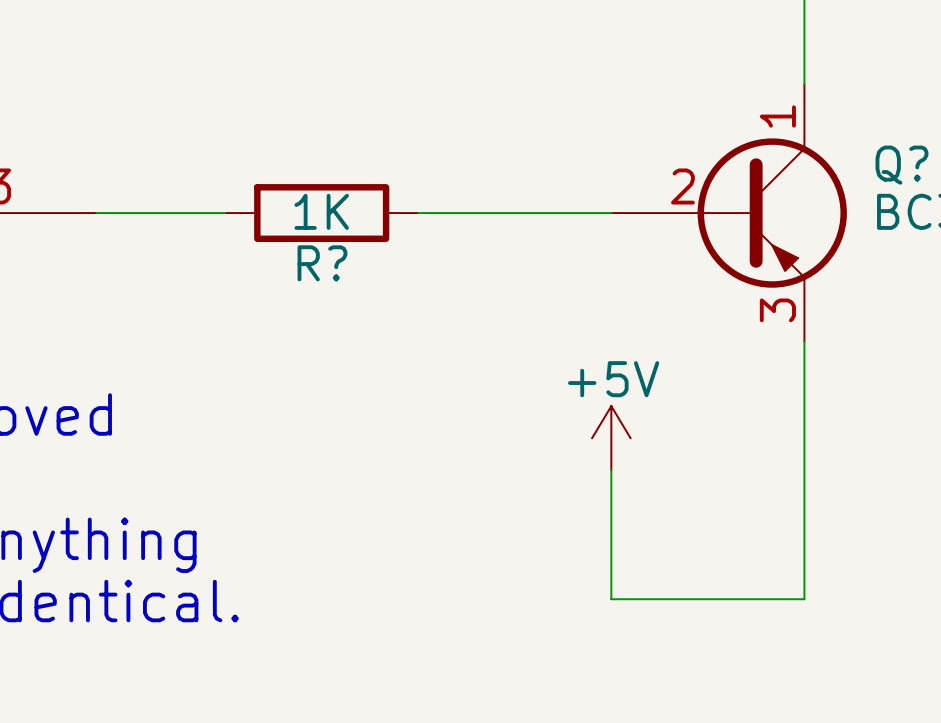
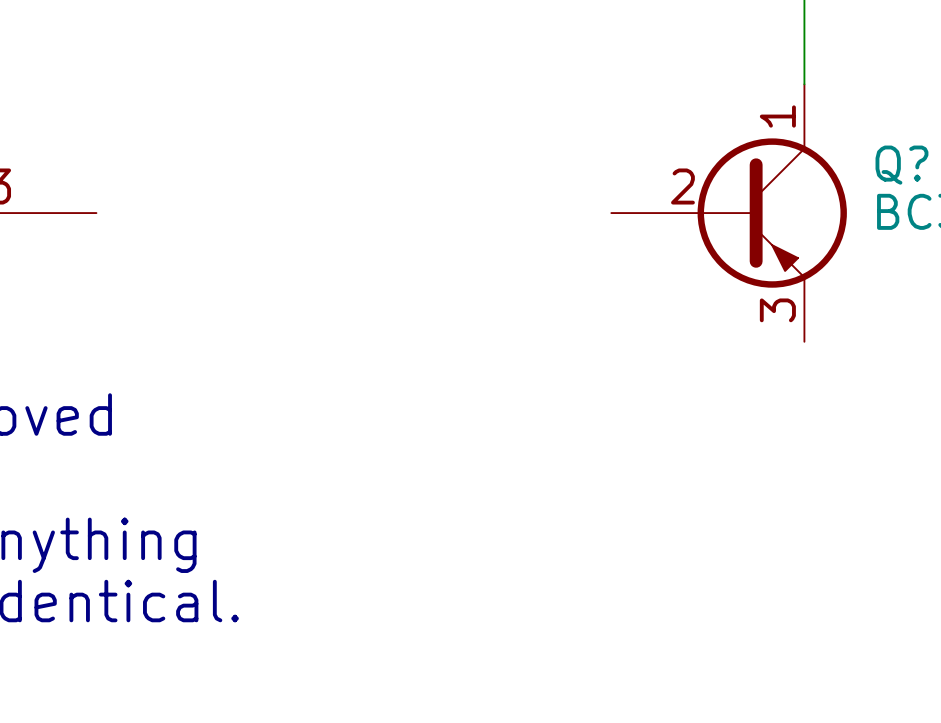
wire: (96, 213) (225, 213) -> none
R?: 1K (321, 213) -> none
wire: (418, 213) (611, 213) -> none
wire: (804, 341) (804, 599) (611, 599) (611, 470) -> none
power symbol: +5V (611, 438) -> none

